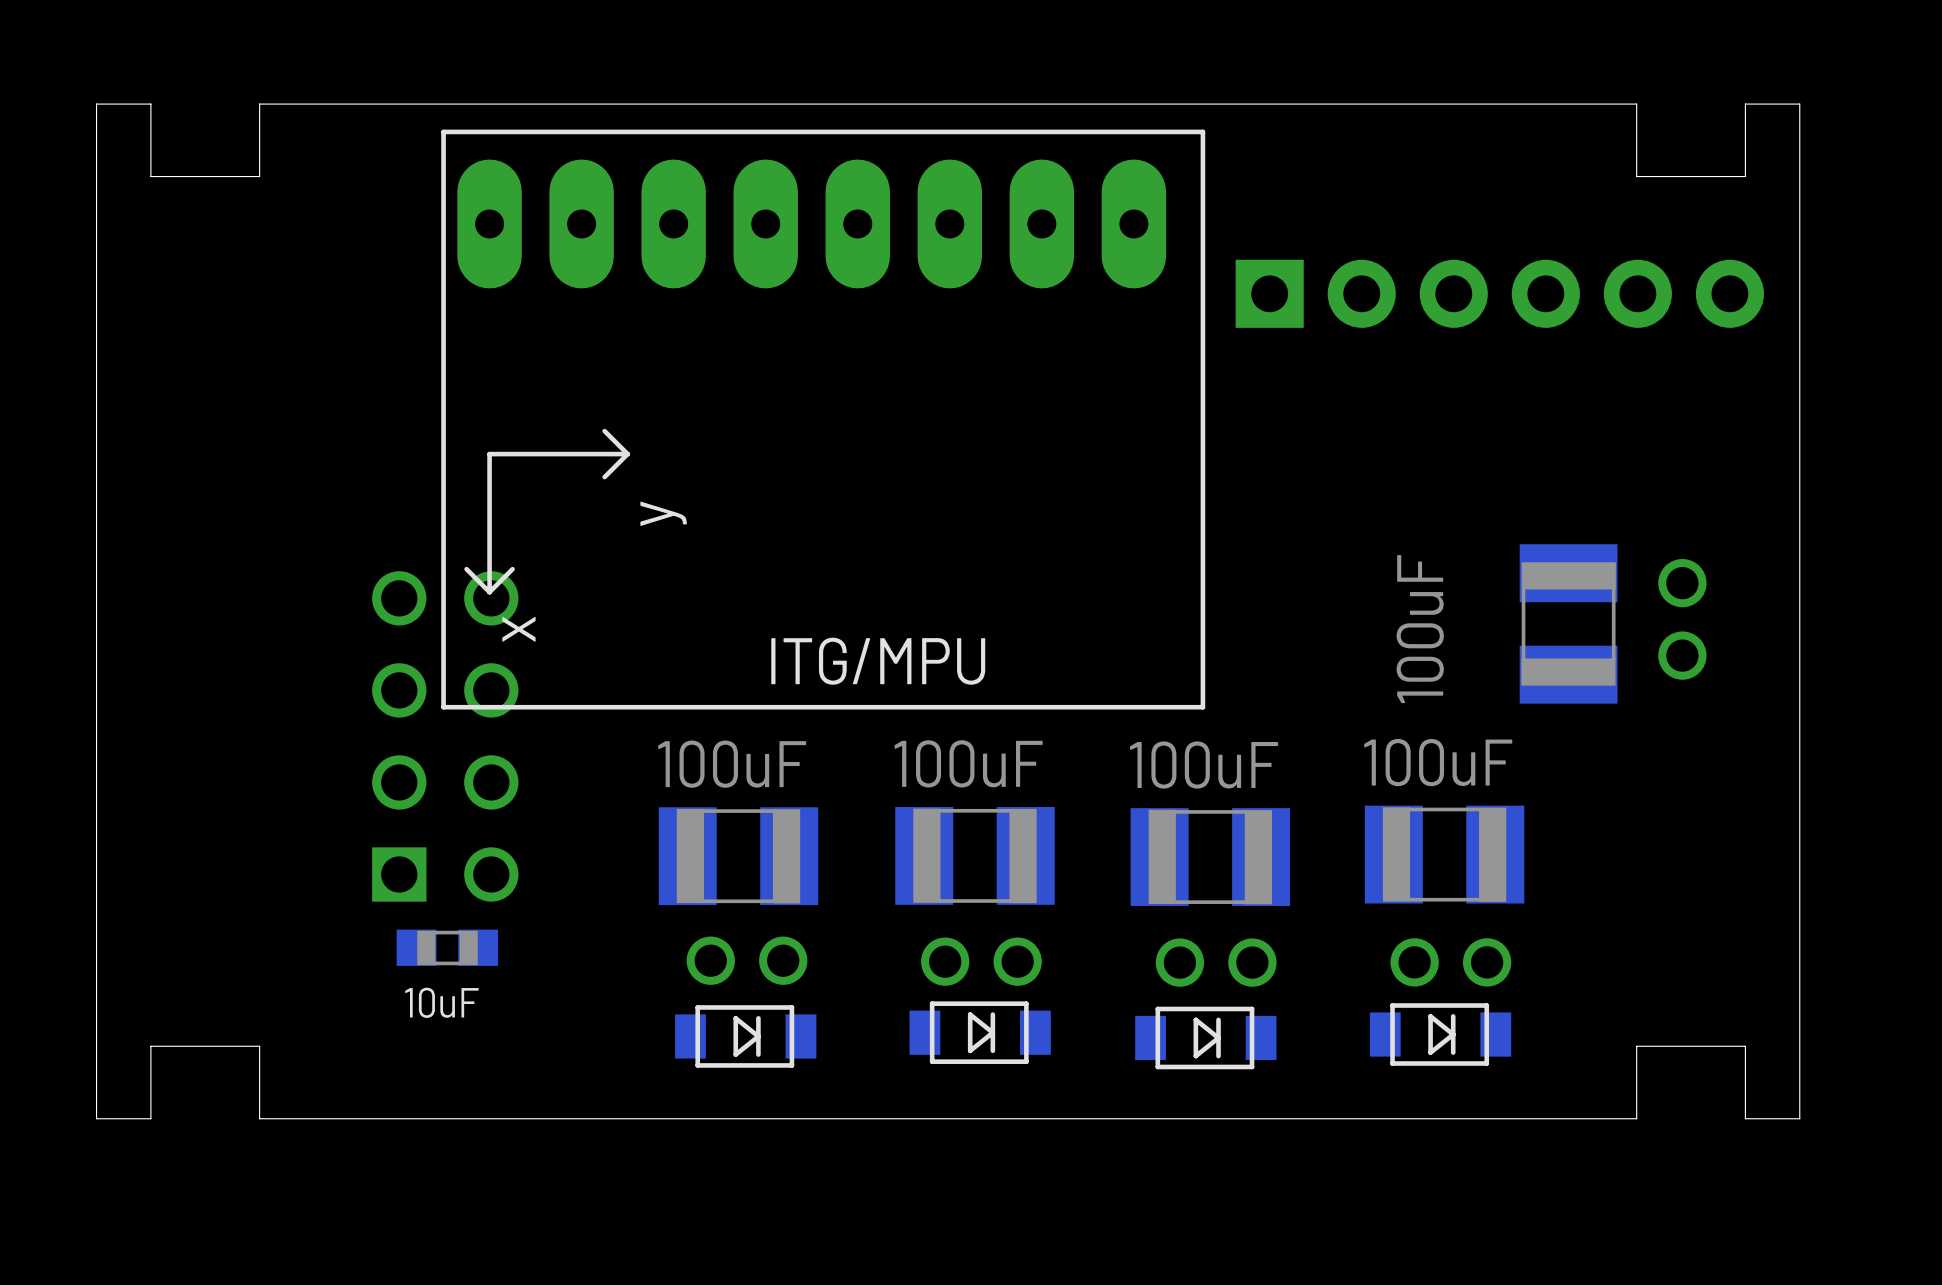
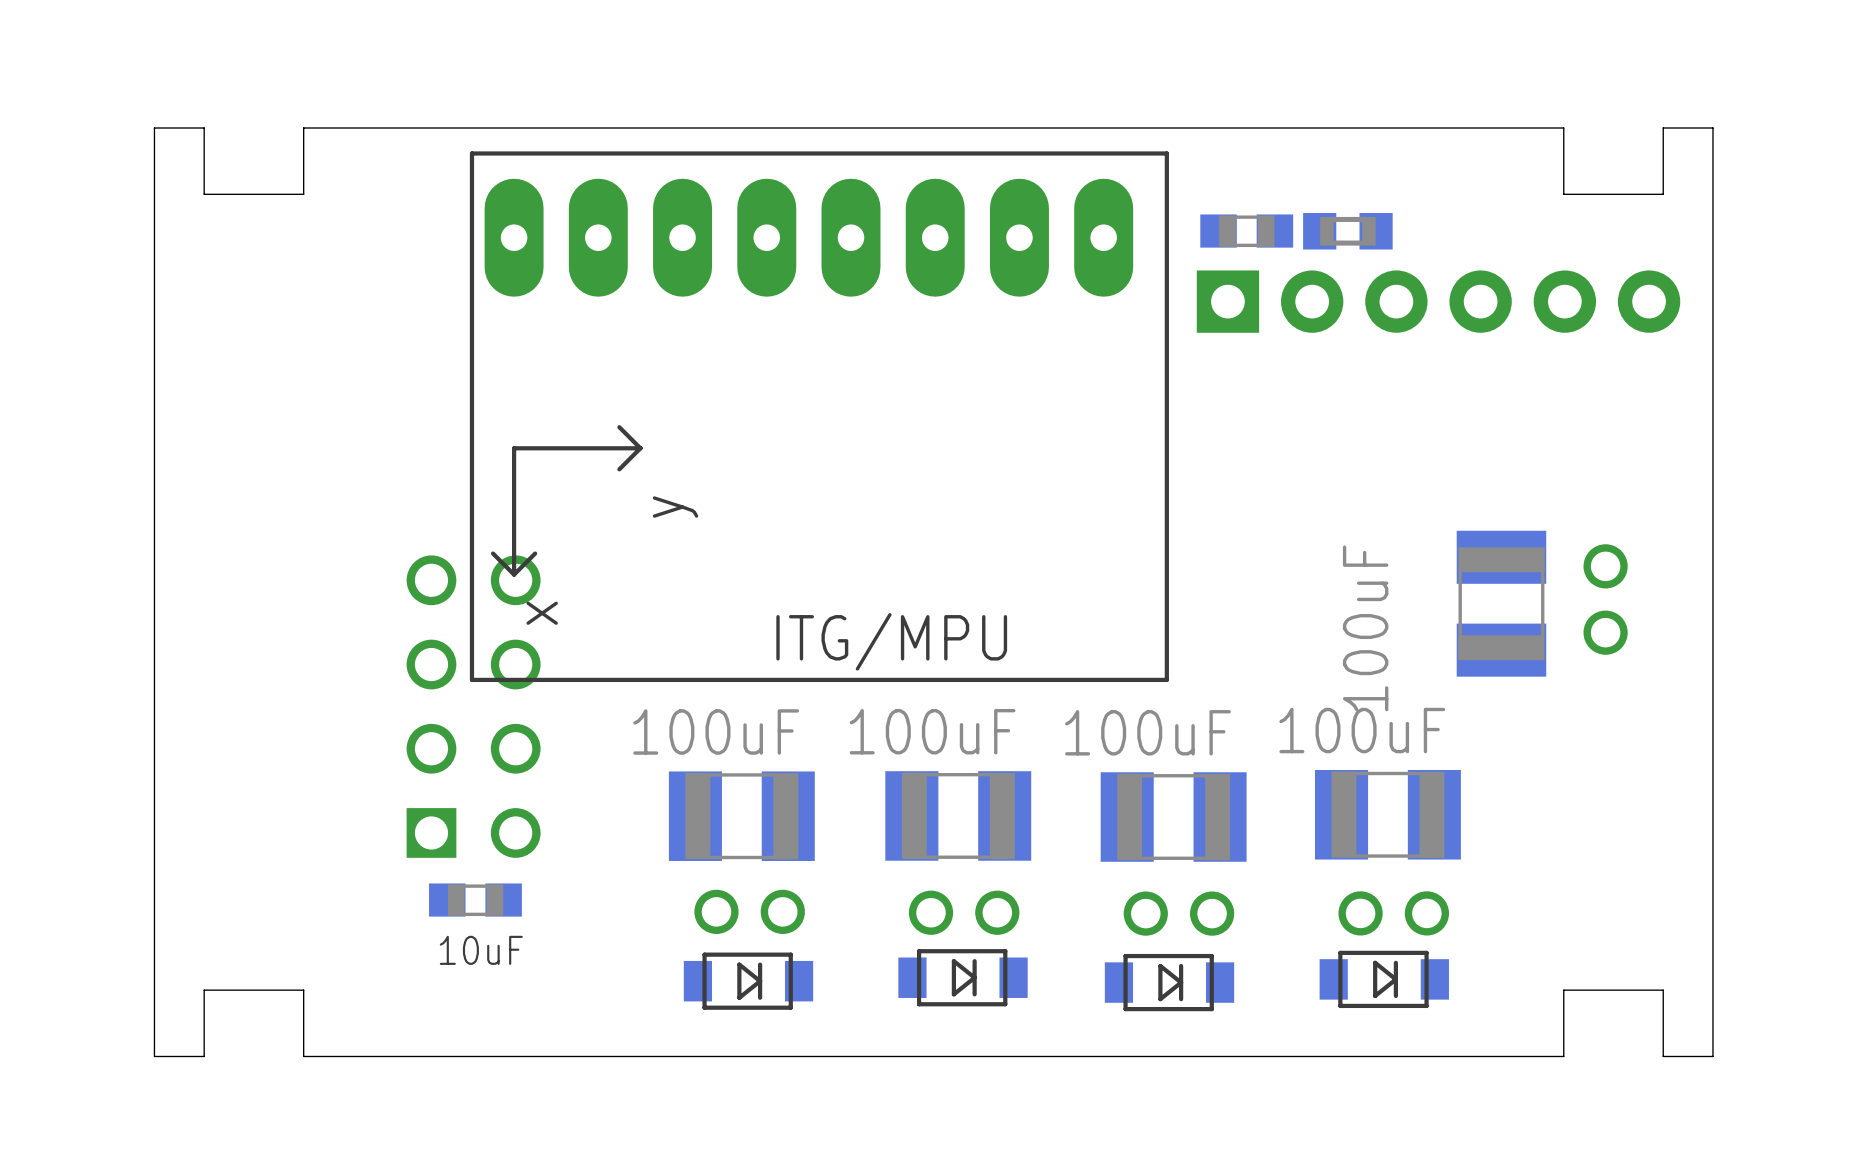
part: none -> (1246, 231)
part: none -> (1347, 231)

